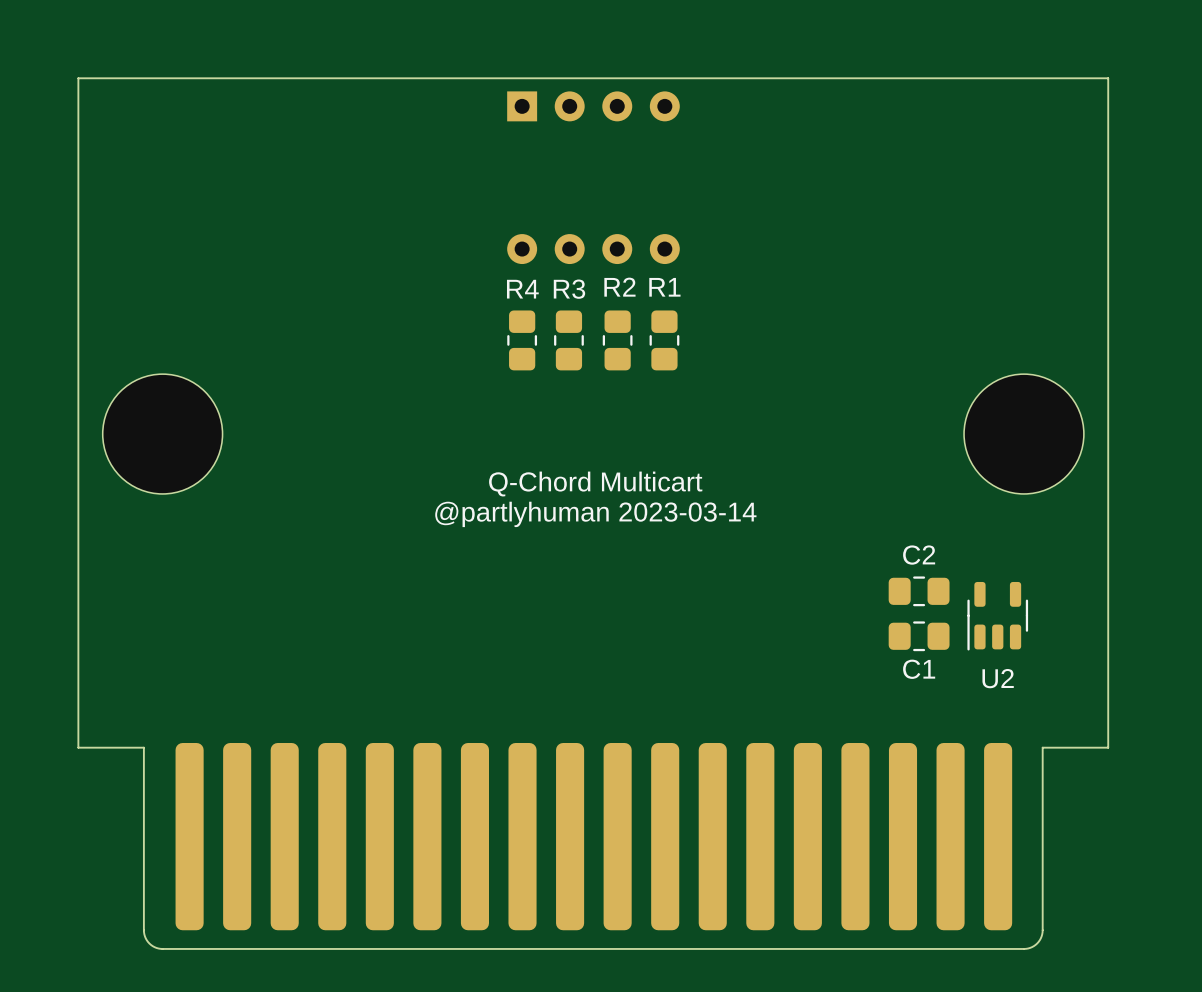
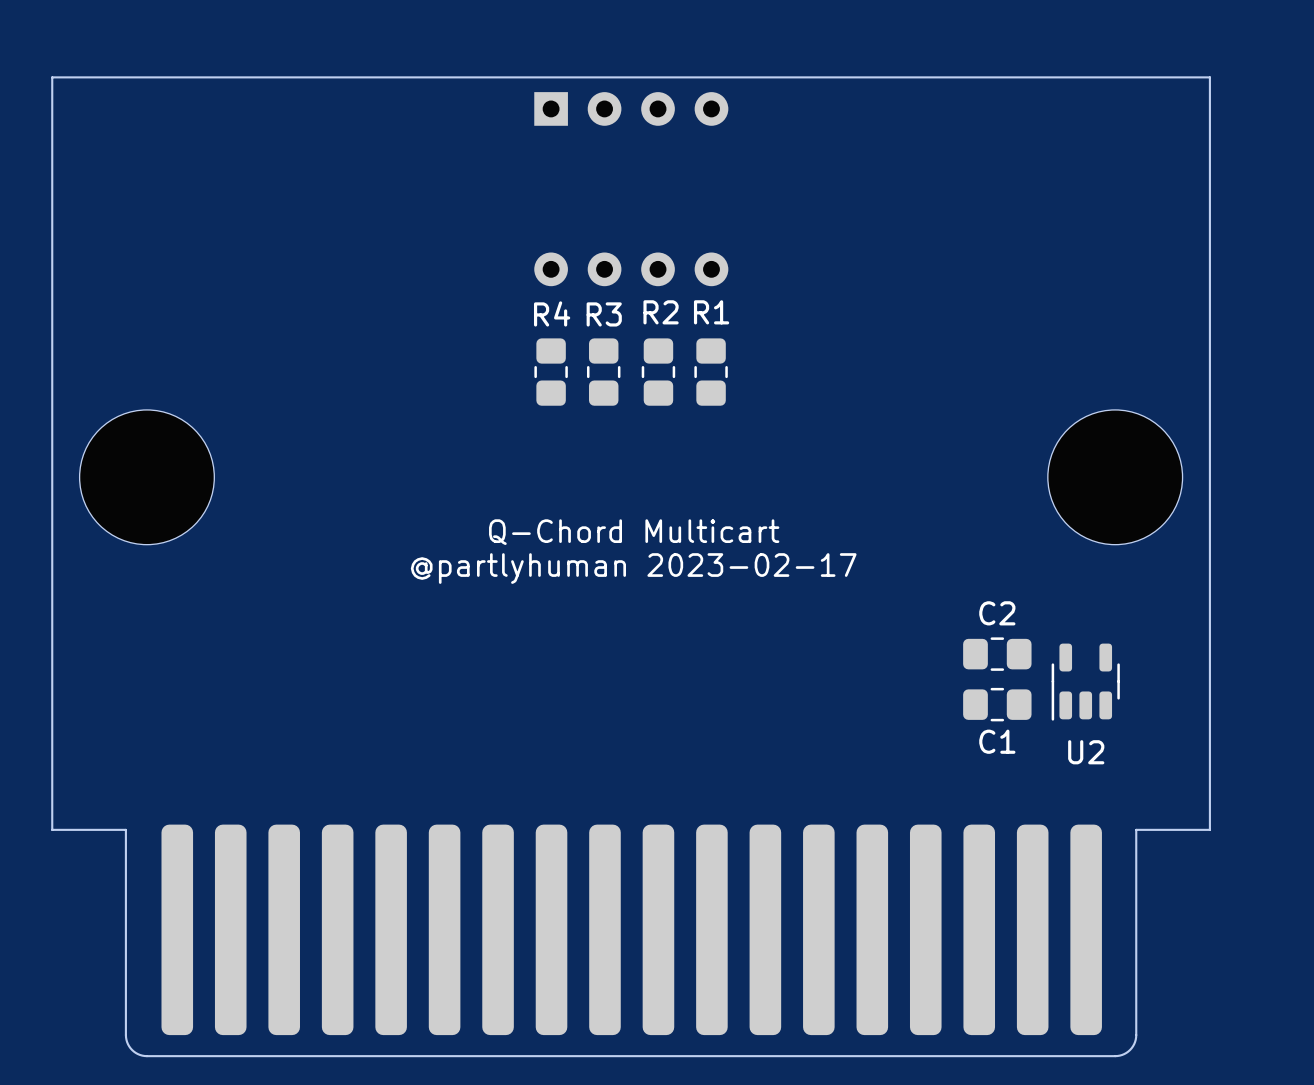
text: @partlyhuman 2023-03-14 (595, 514) -> @partlyhuman 2023-02-17 (633, 568)

